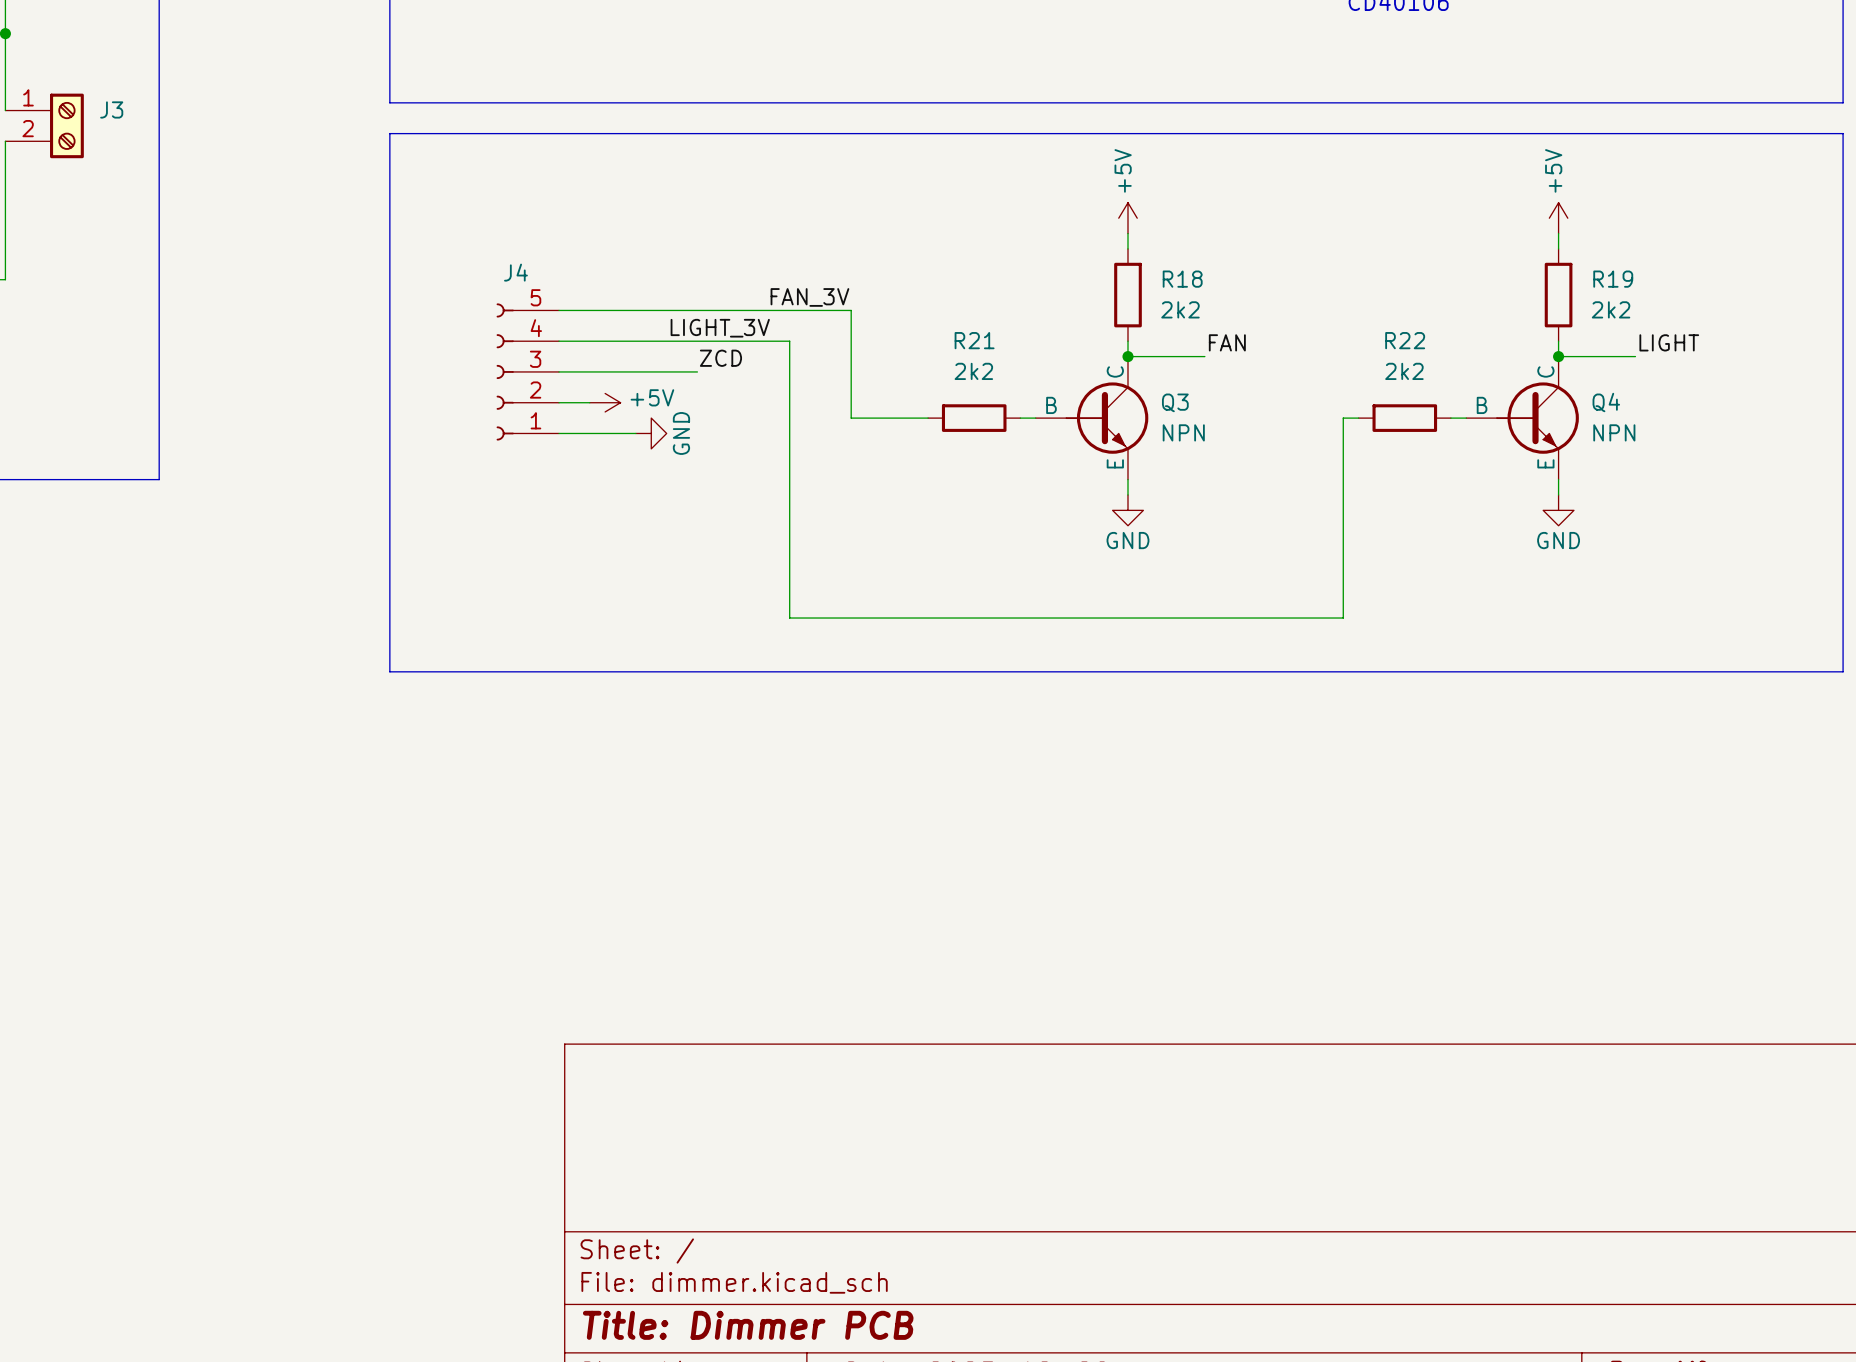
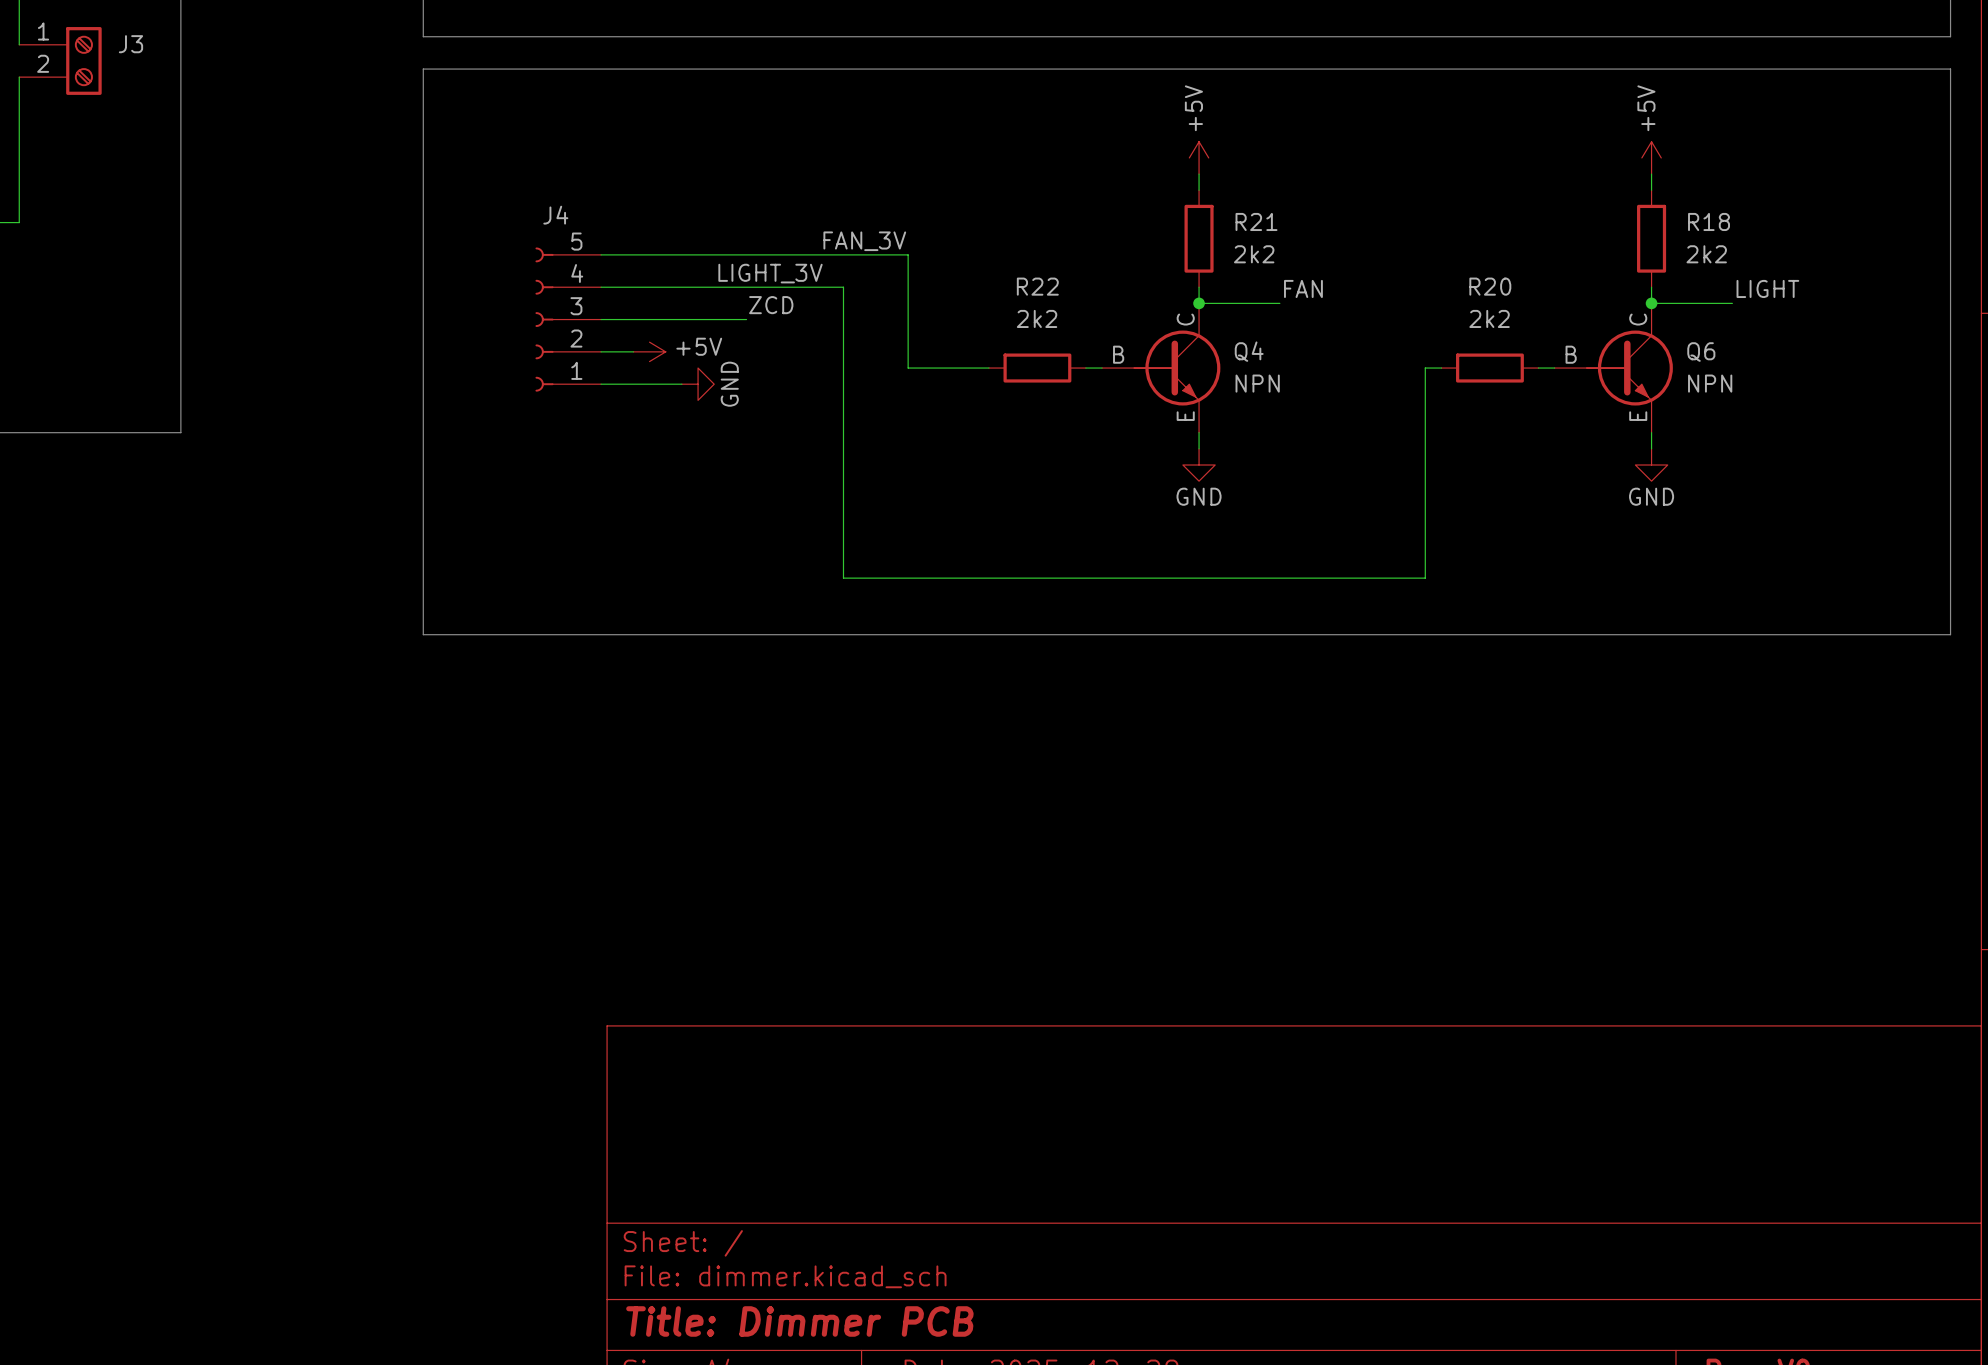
R18 name: R18 (1182, 279) -> R21 (1256, 221)
R19 name: R19 (1613, 279) -> R18 (1709, 221)
R21 name: R21 (974, 340) -> R22 (1037, 286)
R22 name: R22 (1405, 340) -> R20 (1490, 286)
Q3 name: Q3 (1175, 402) -> Q4 (1249, 351)
Q4 name: Q4 (1606, 402) -> Q6 (1701, 352)

